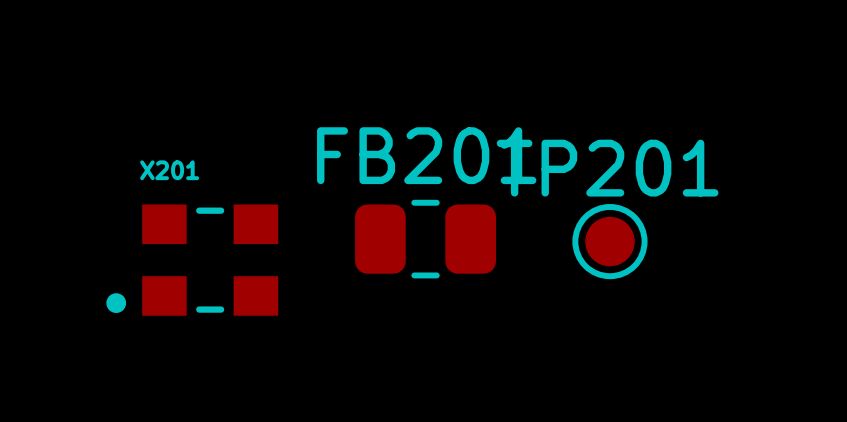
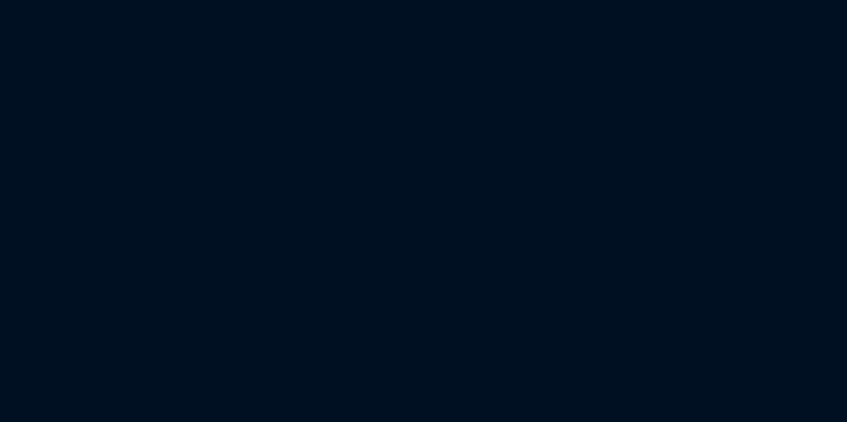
FB201: (425, 239) -> none
TP201: (609, 241) -> none
X201: (192, 260) -> none

